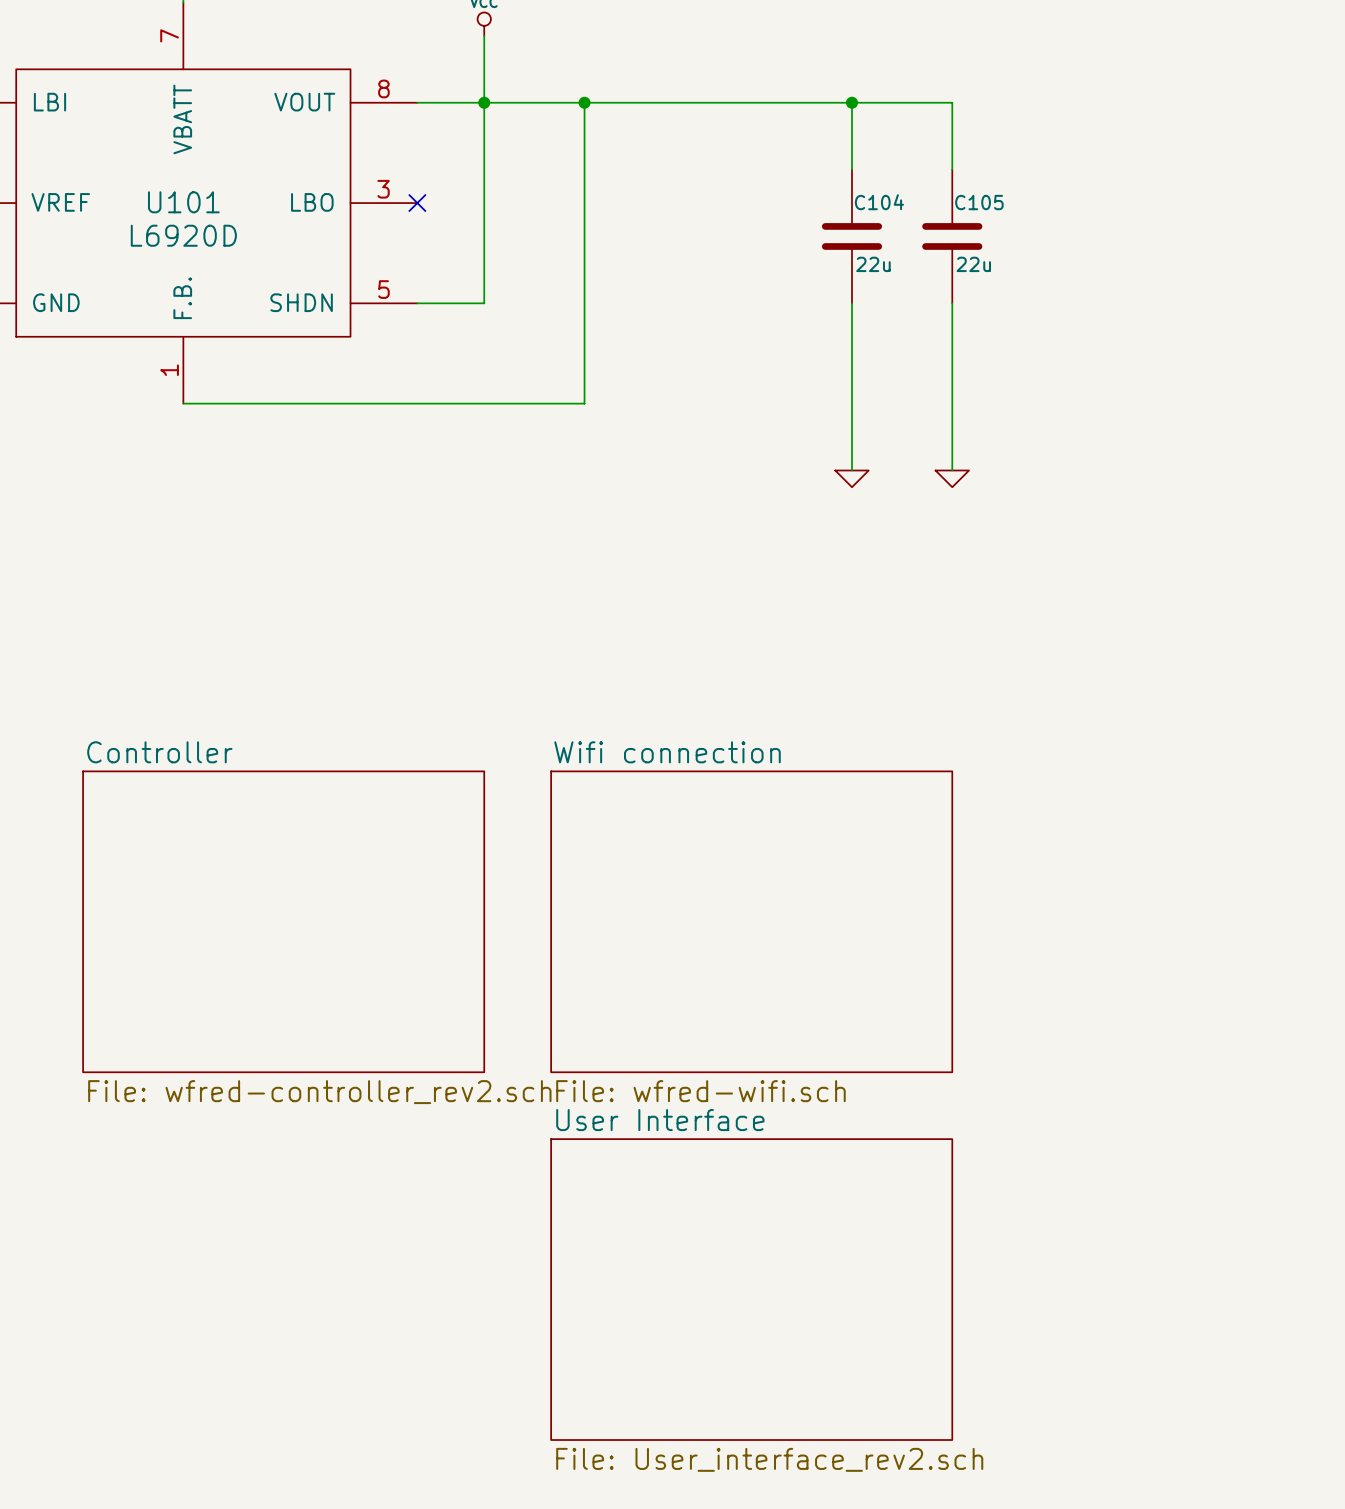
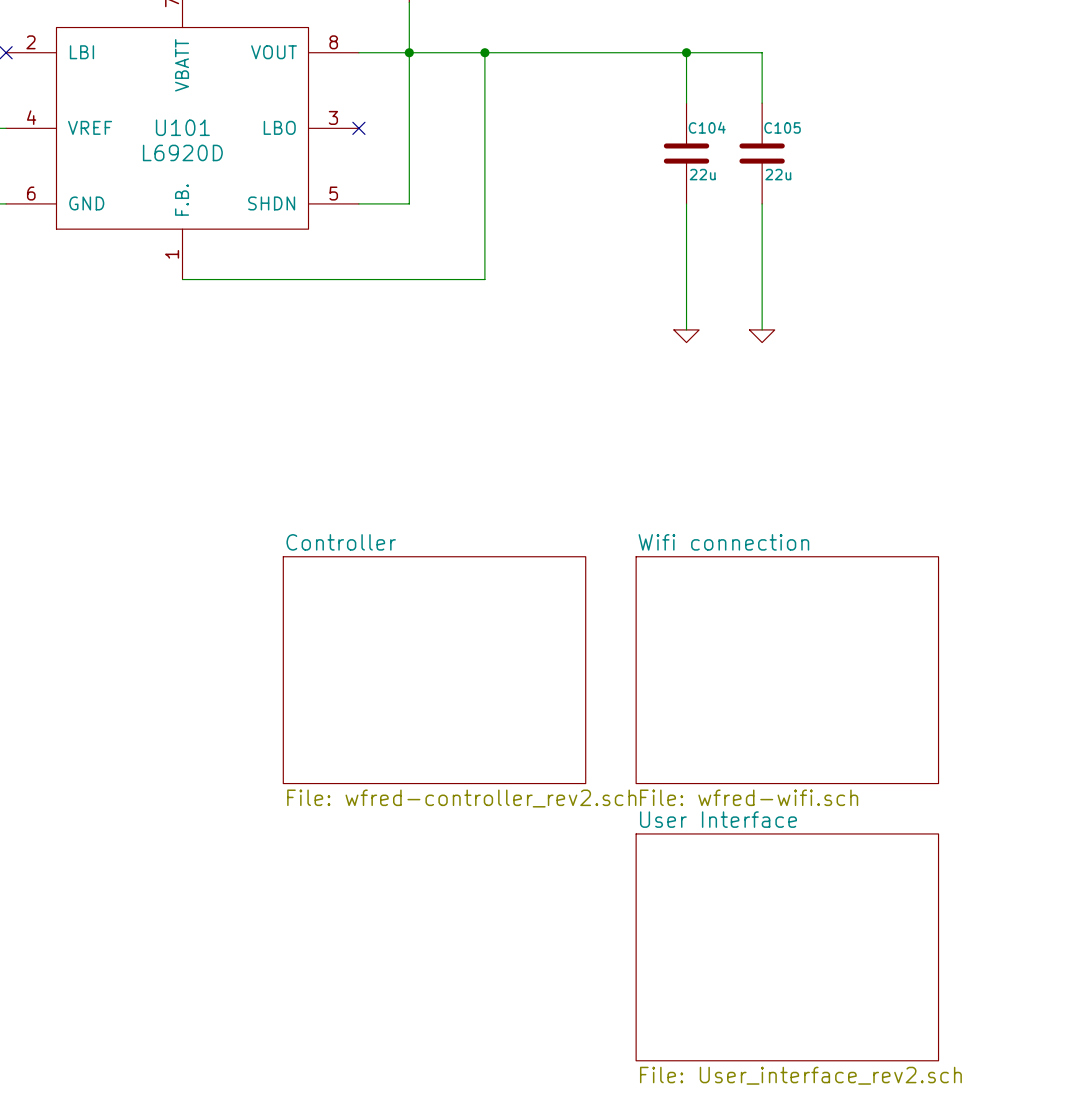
sheet Controller position: (283, 921) -> (434, 670)
sheet Wifi connection position: (751, 921) -> (787, 670)
sheet User Interface position: (751, 1289) -> (787, 947)

